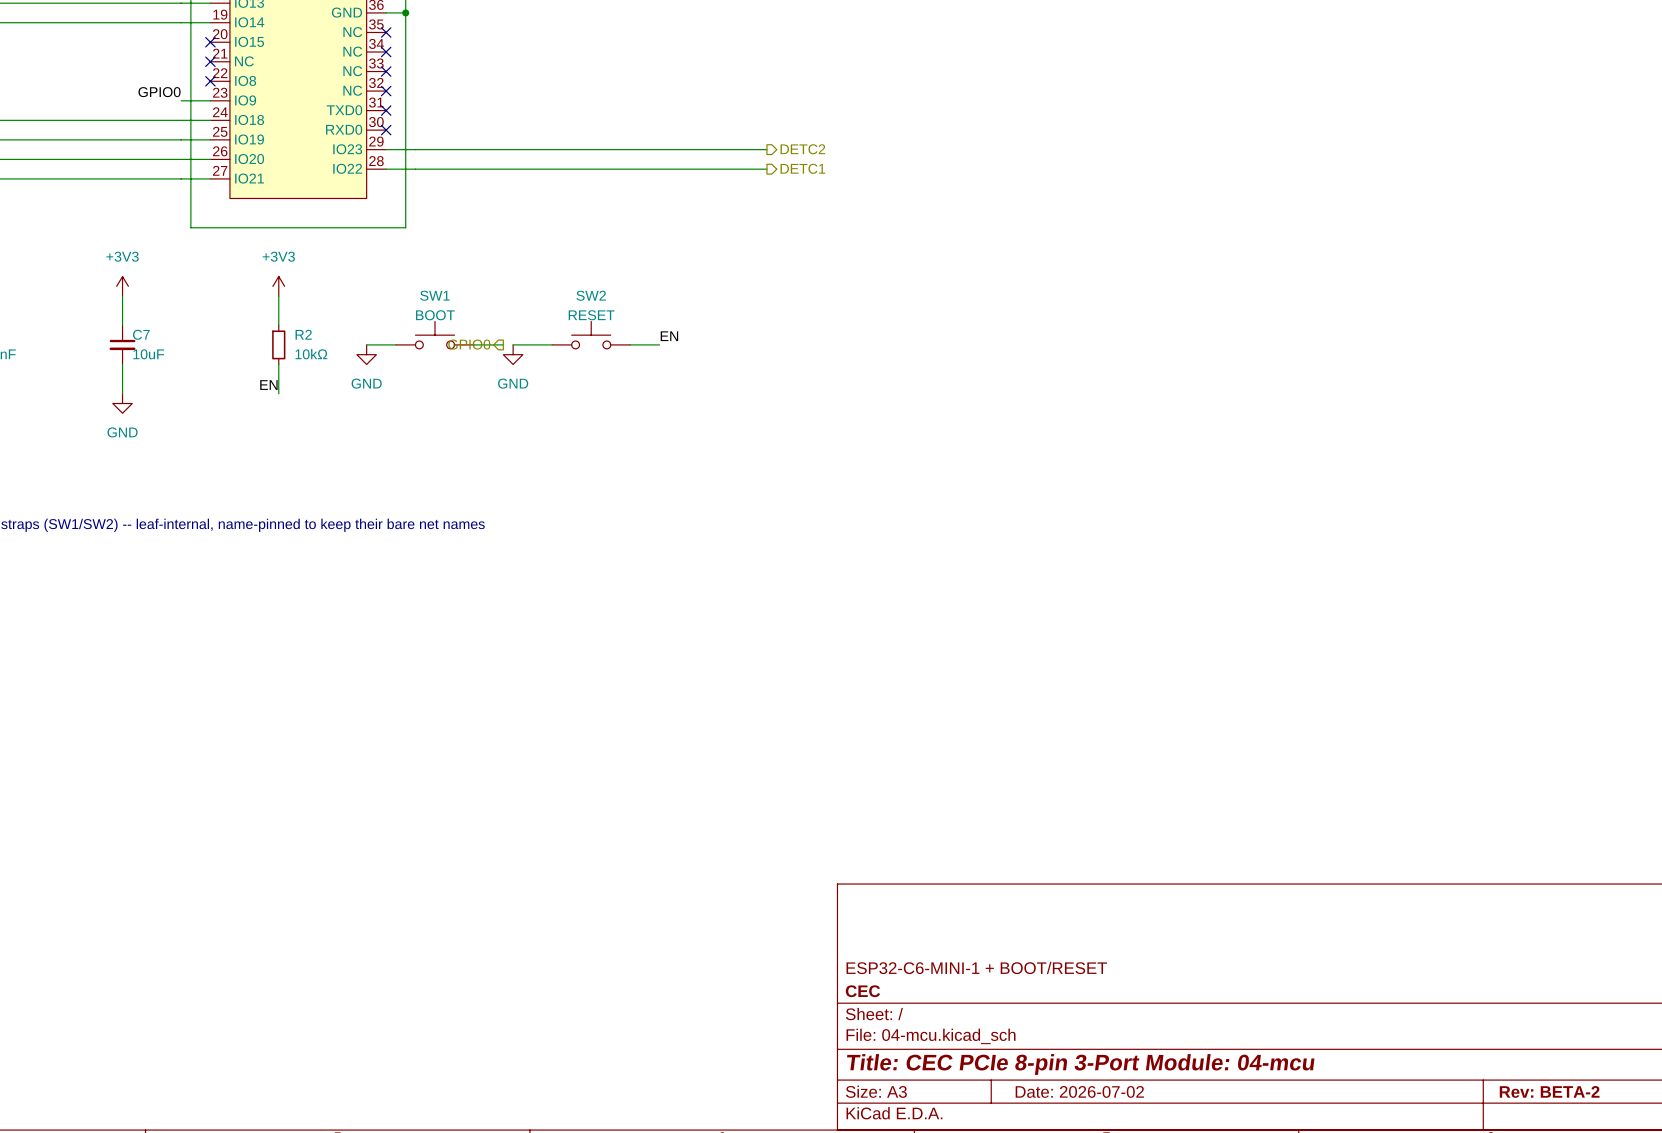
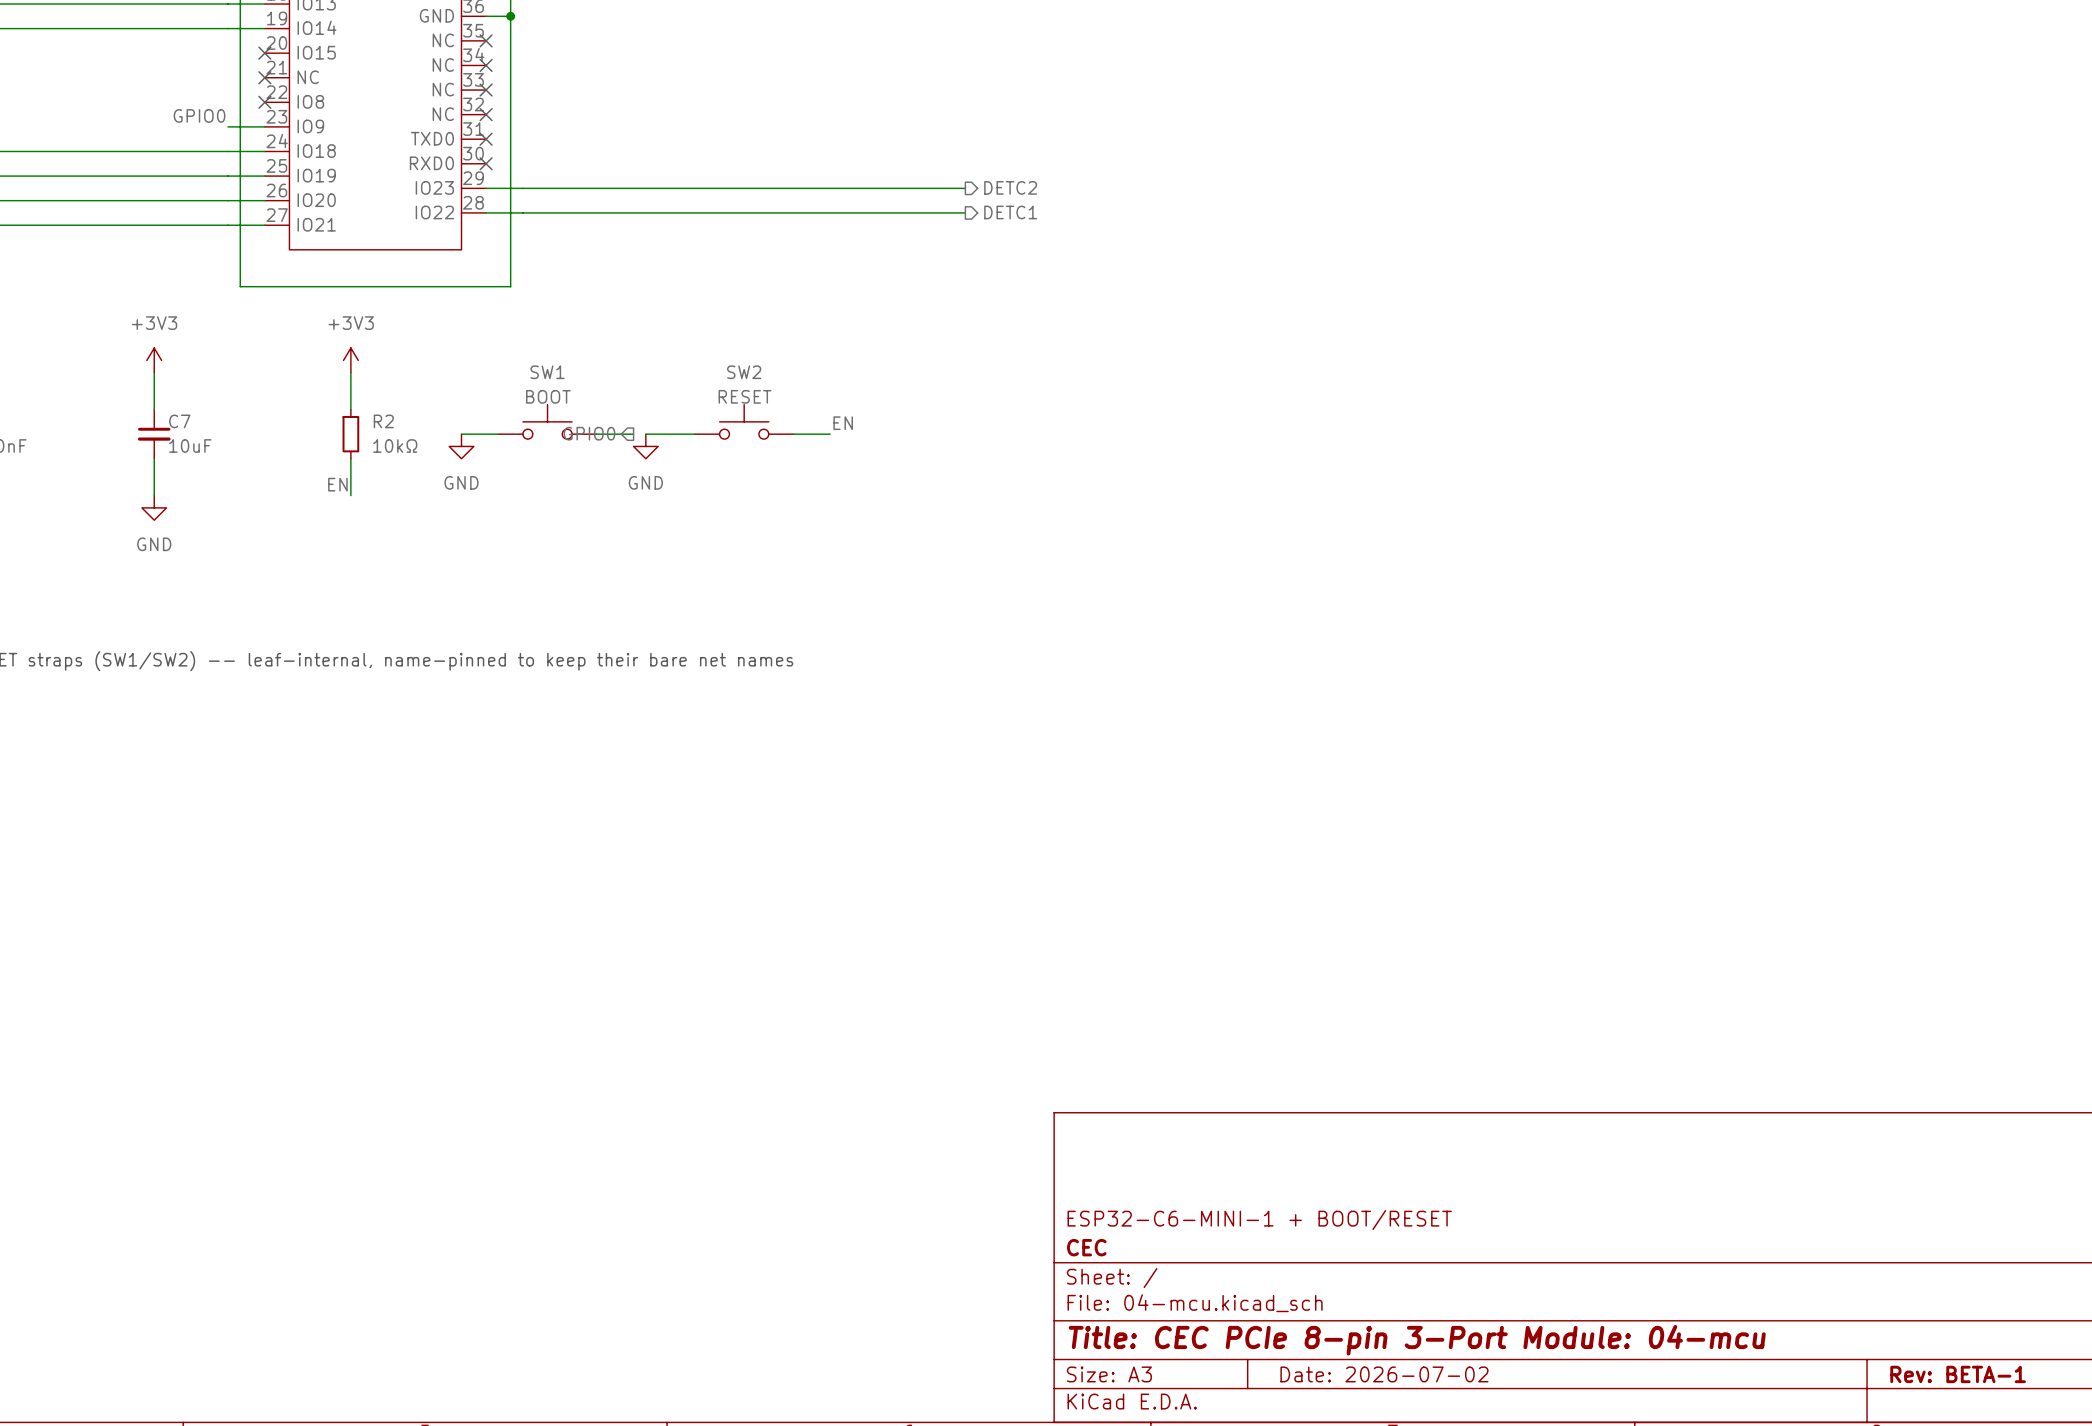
title block: Rev: BETA-2 (1549, 1091) -> Rev: BETA-1 (1958, 1374)

